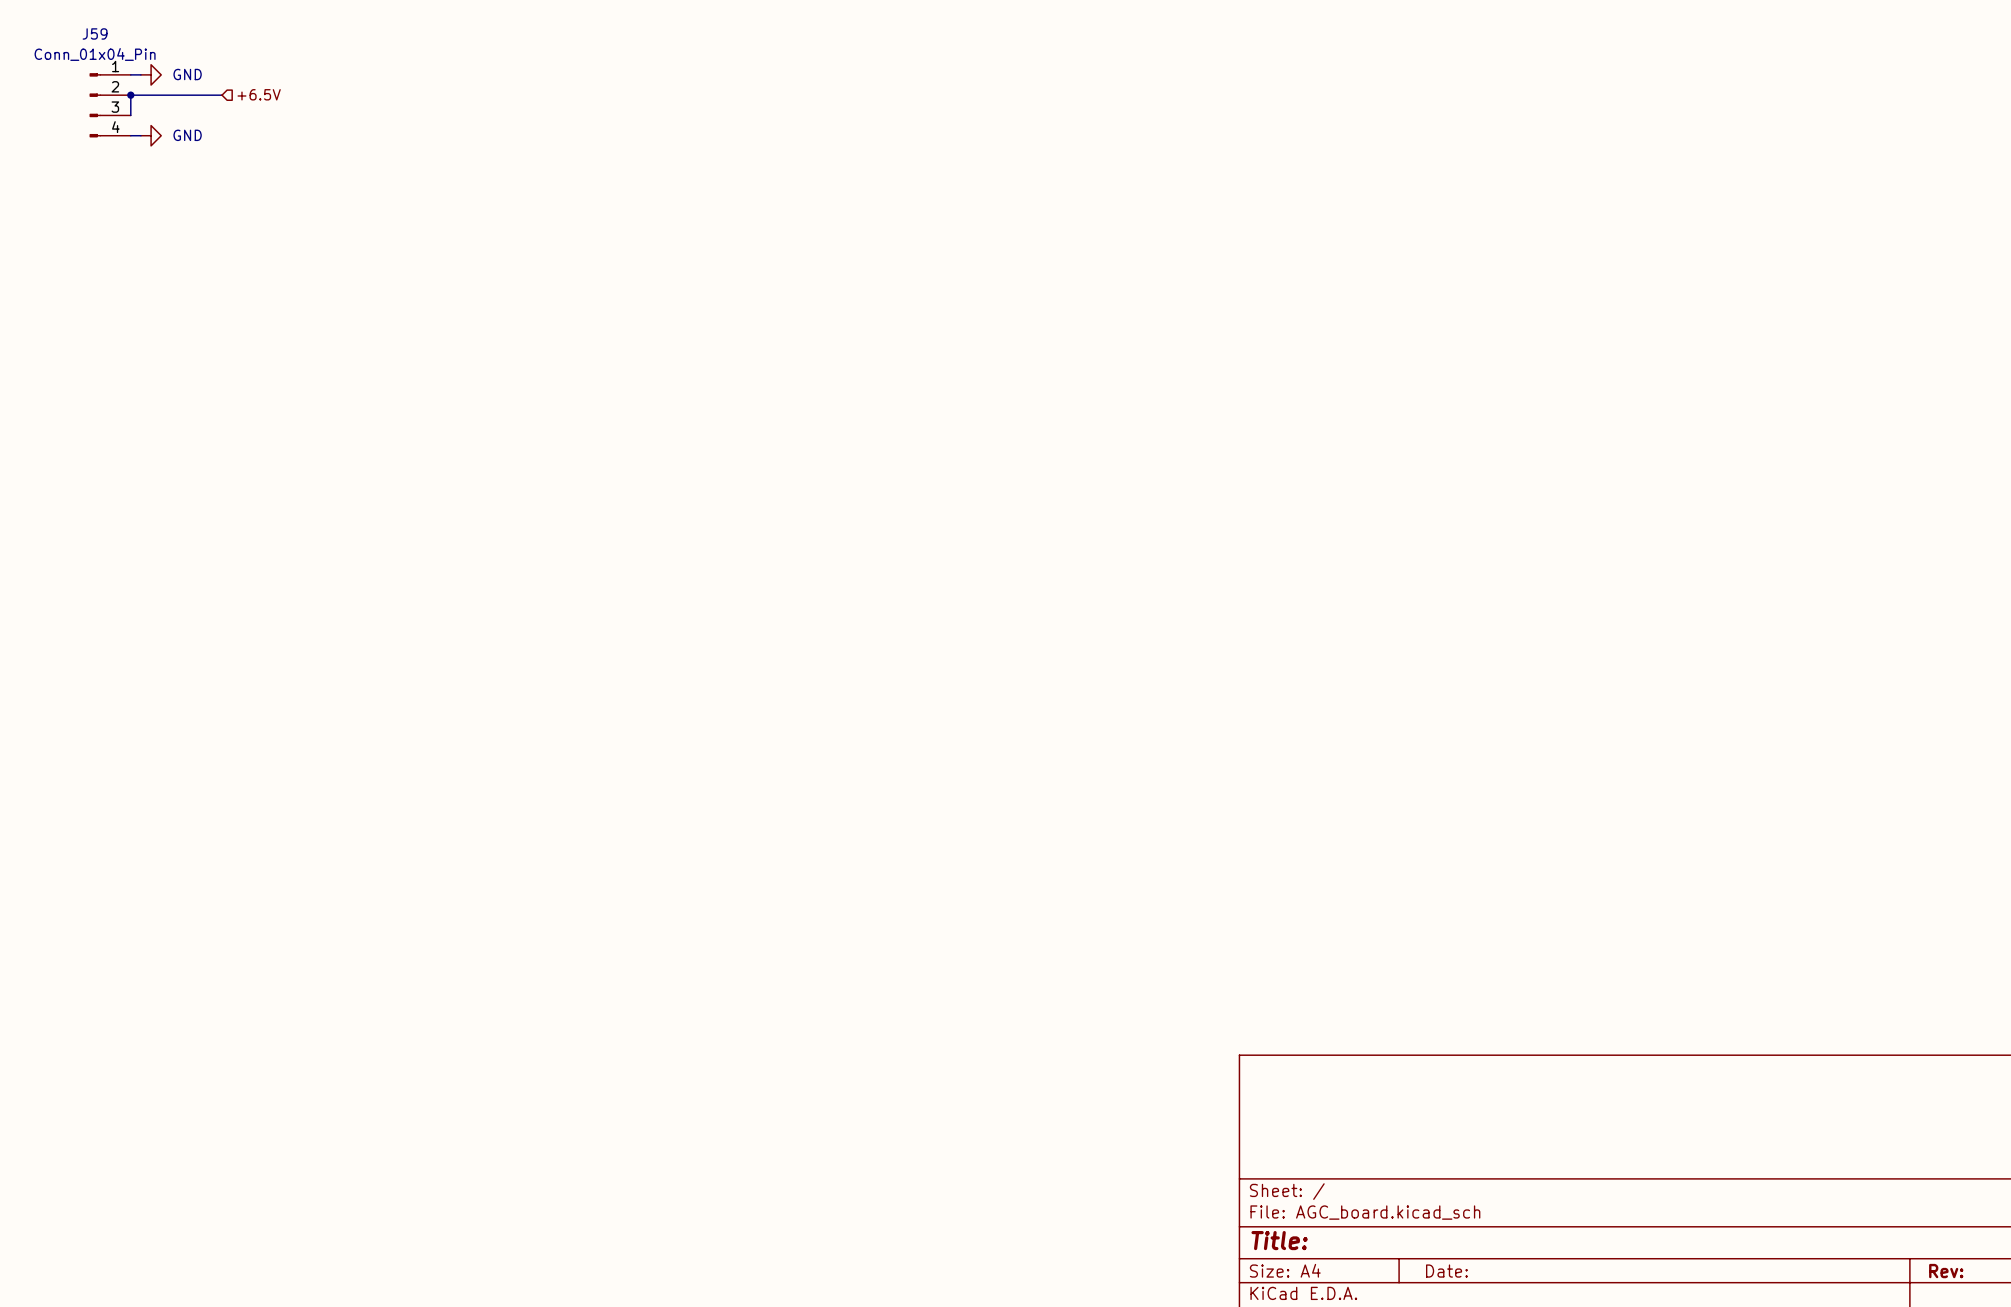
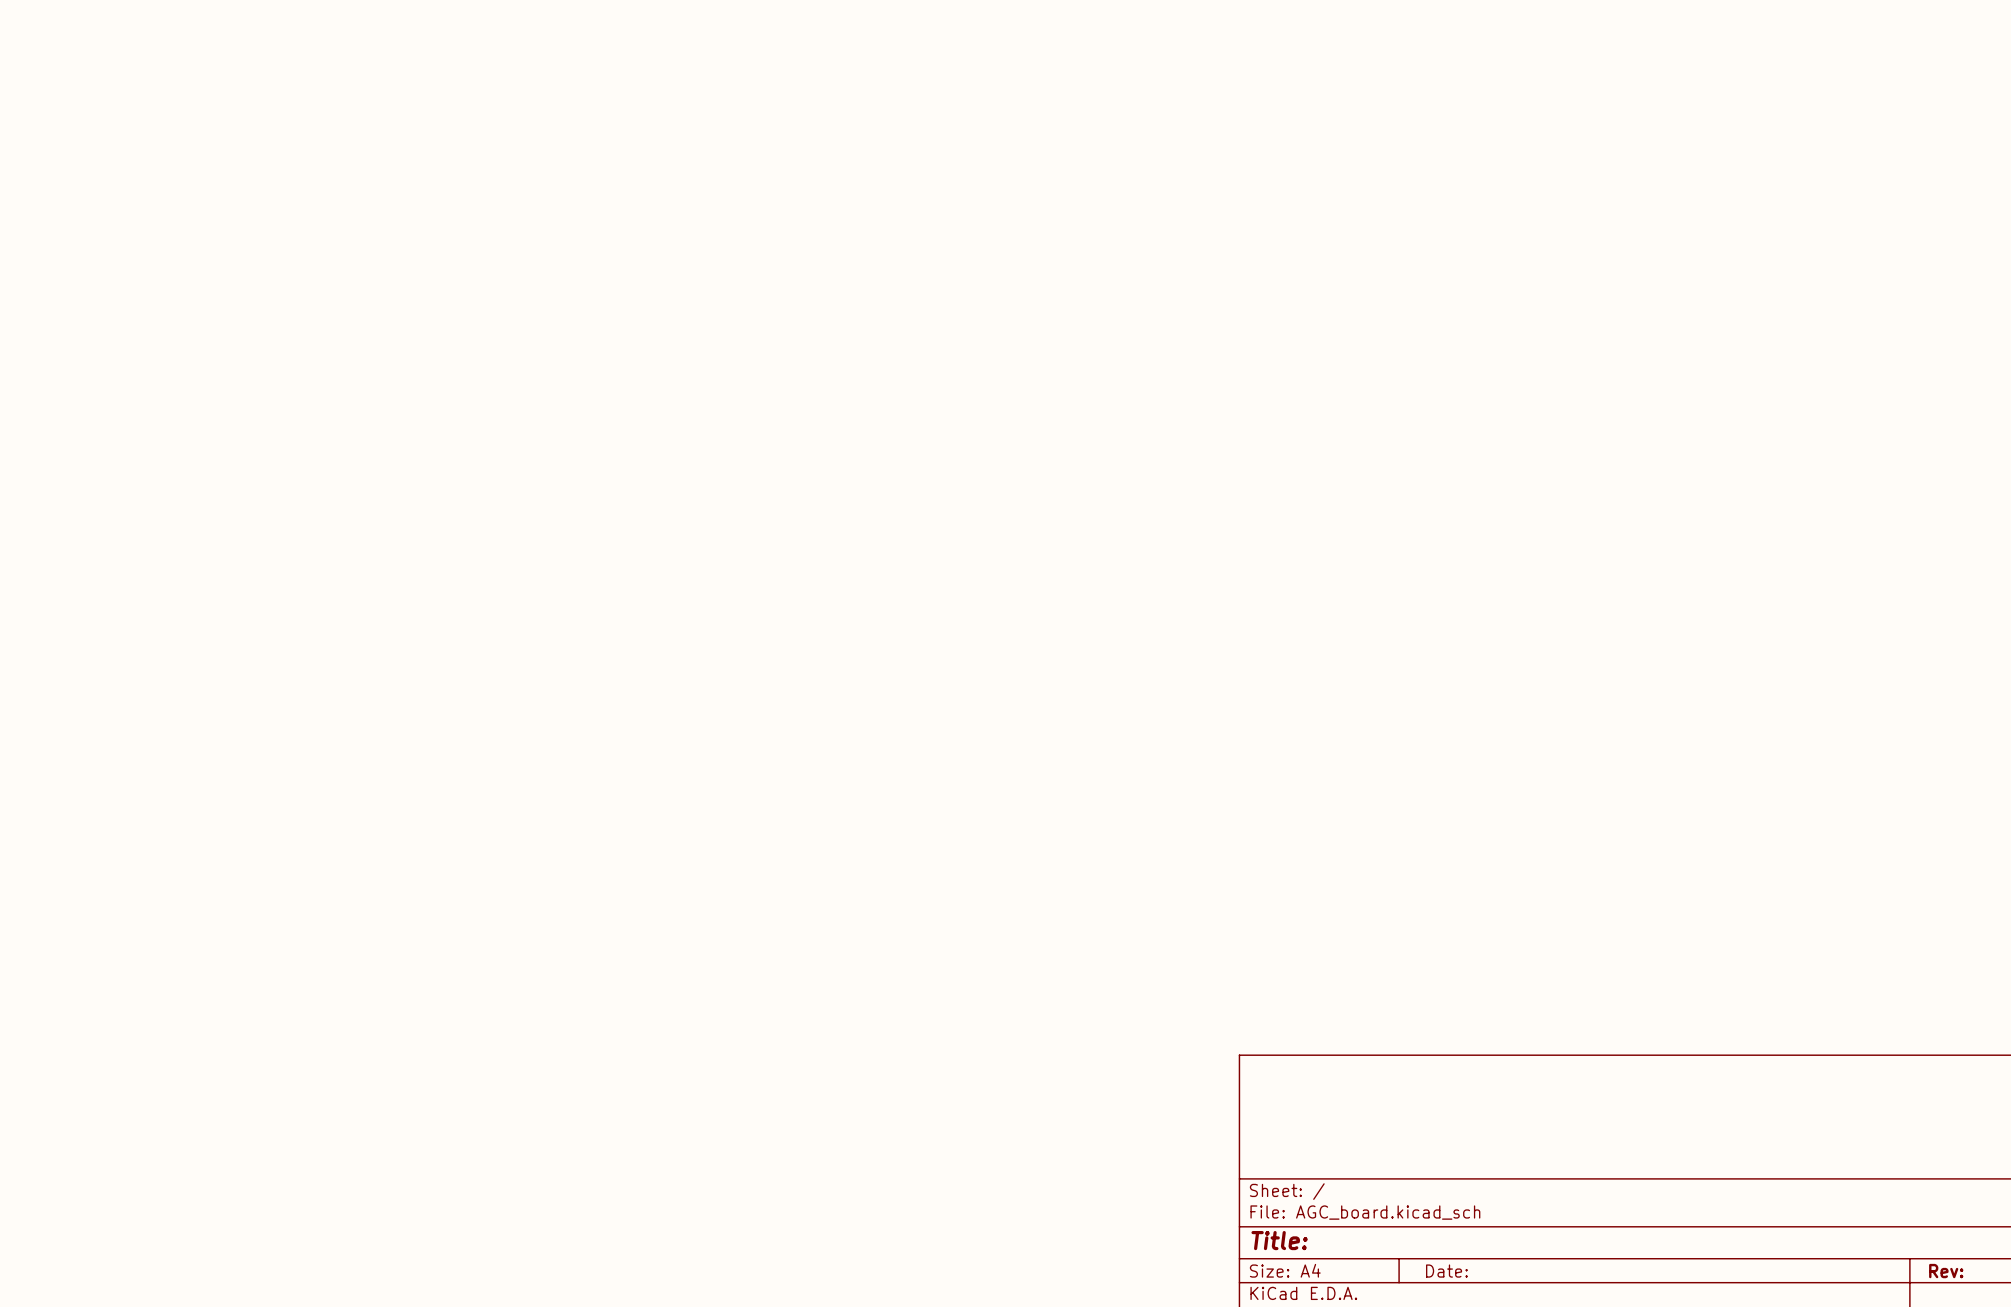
wire: (130, 74) (140, 74) -> none
power symbol: GND (151, 74) -> none
hierarchical label: +6.5V (259, 94) -> none
junction: (130, 95) -> none
wire: (222, 95) (130, 95) (130, 115) -> none
J59: Conn_01x04_Pin (110, 105) -> none
wire: (130, 135) (140, 135) -> none
power symbol: GND (151, 135) -> none

